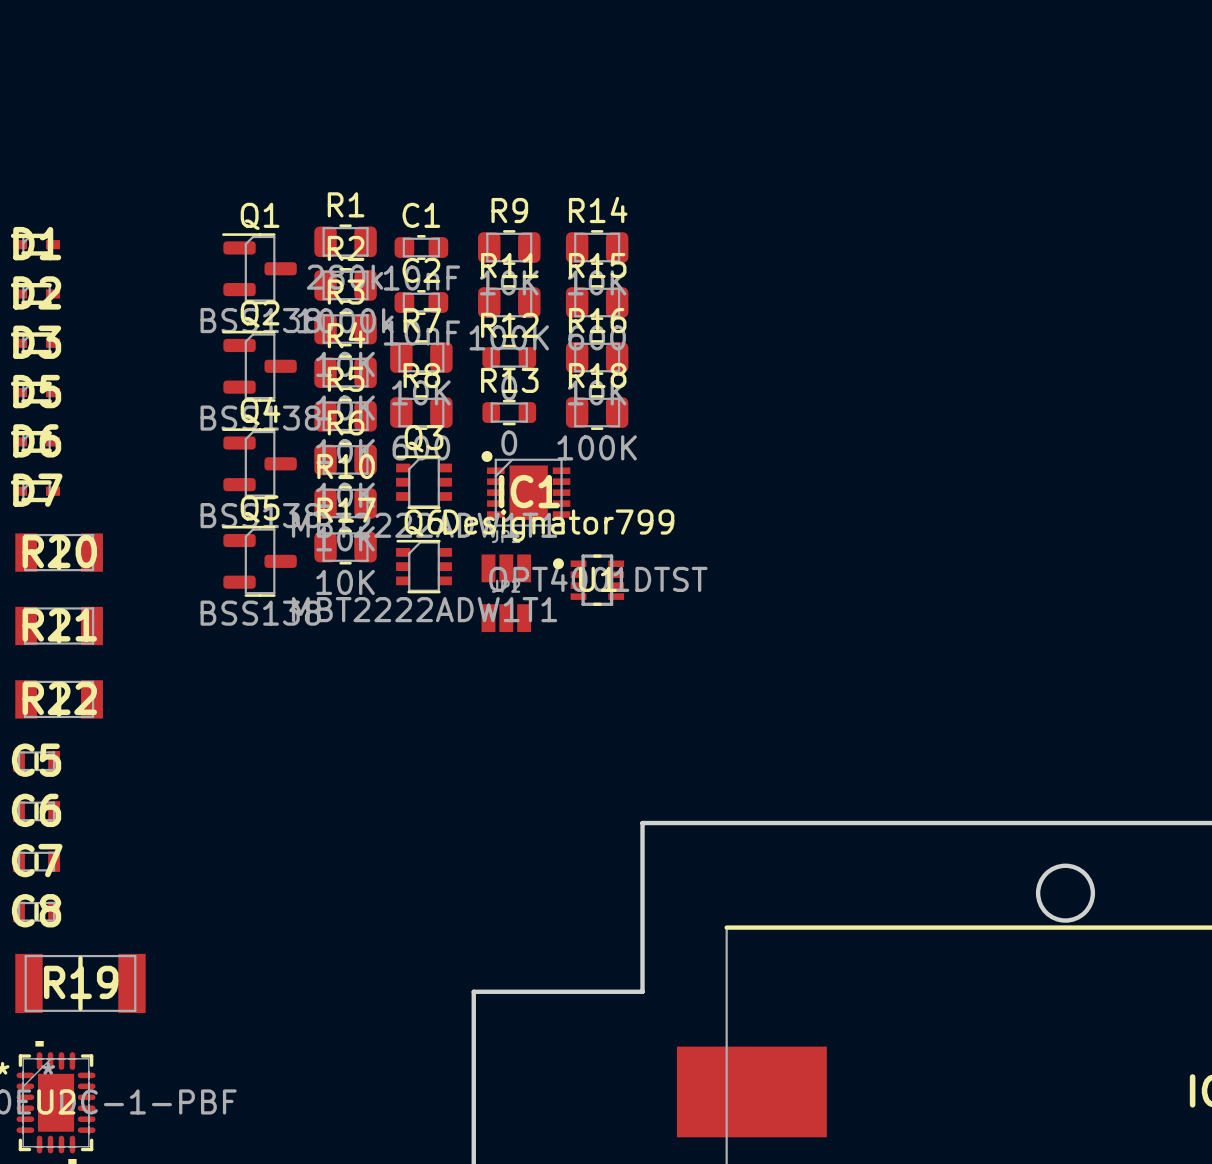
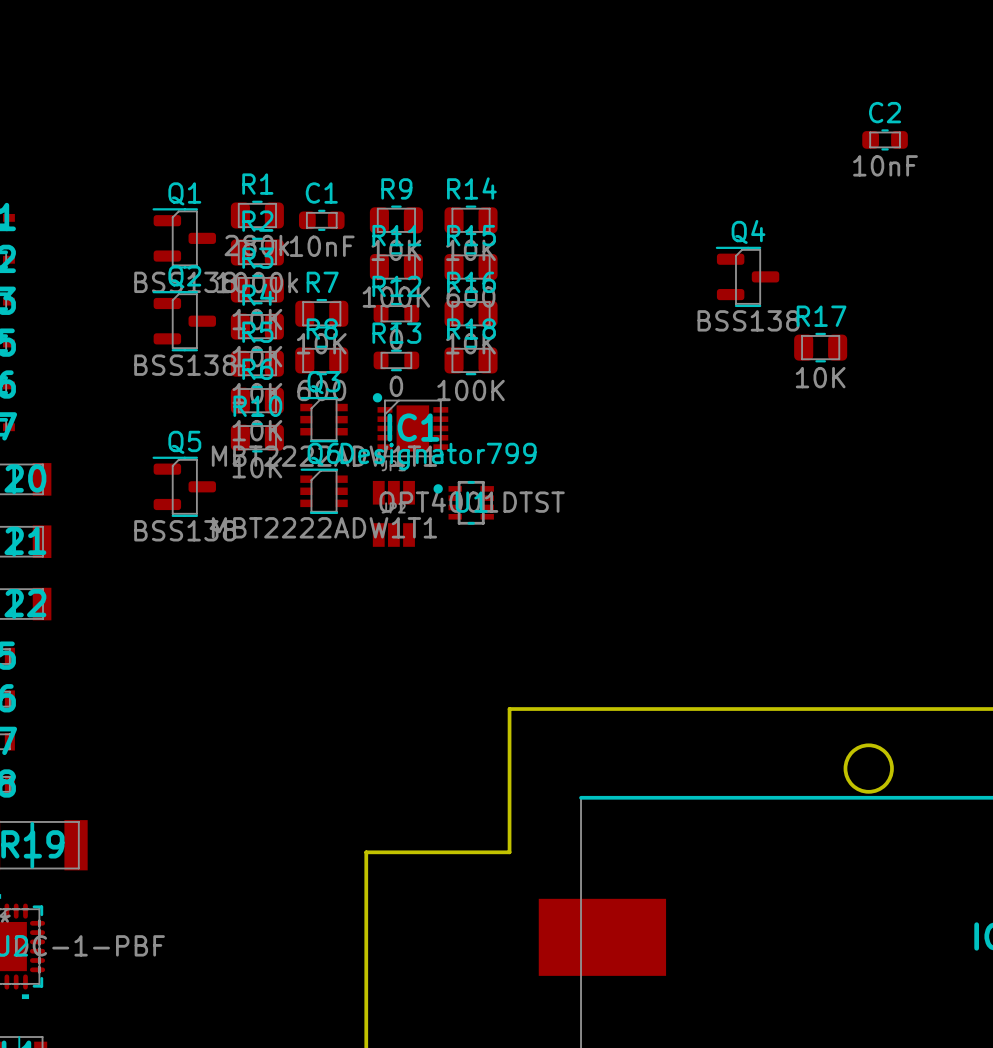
C2 position: (421, 302) -> (885, 139)
Q4 position: (259, 463) -> (747, 276)
R17 position: (345, 547) -> (820, 347)

